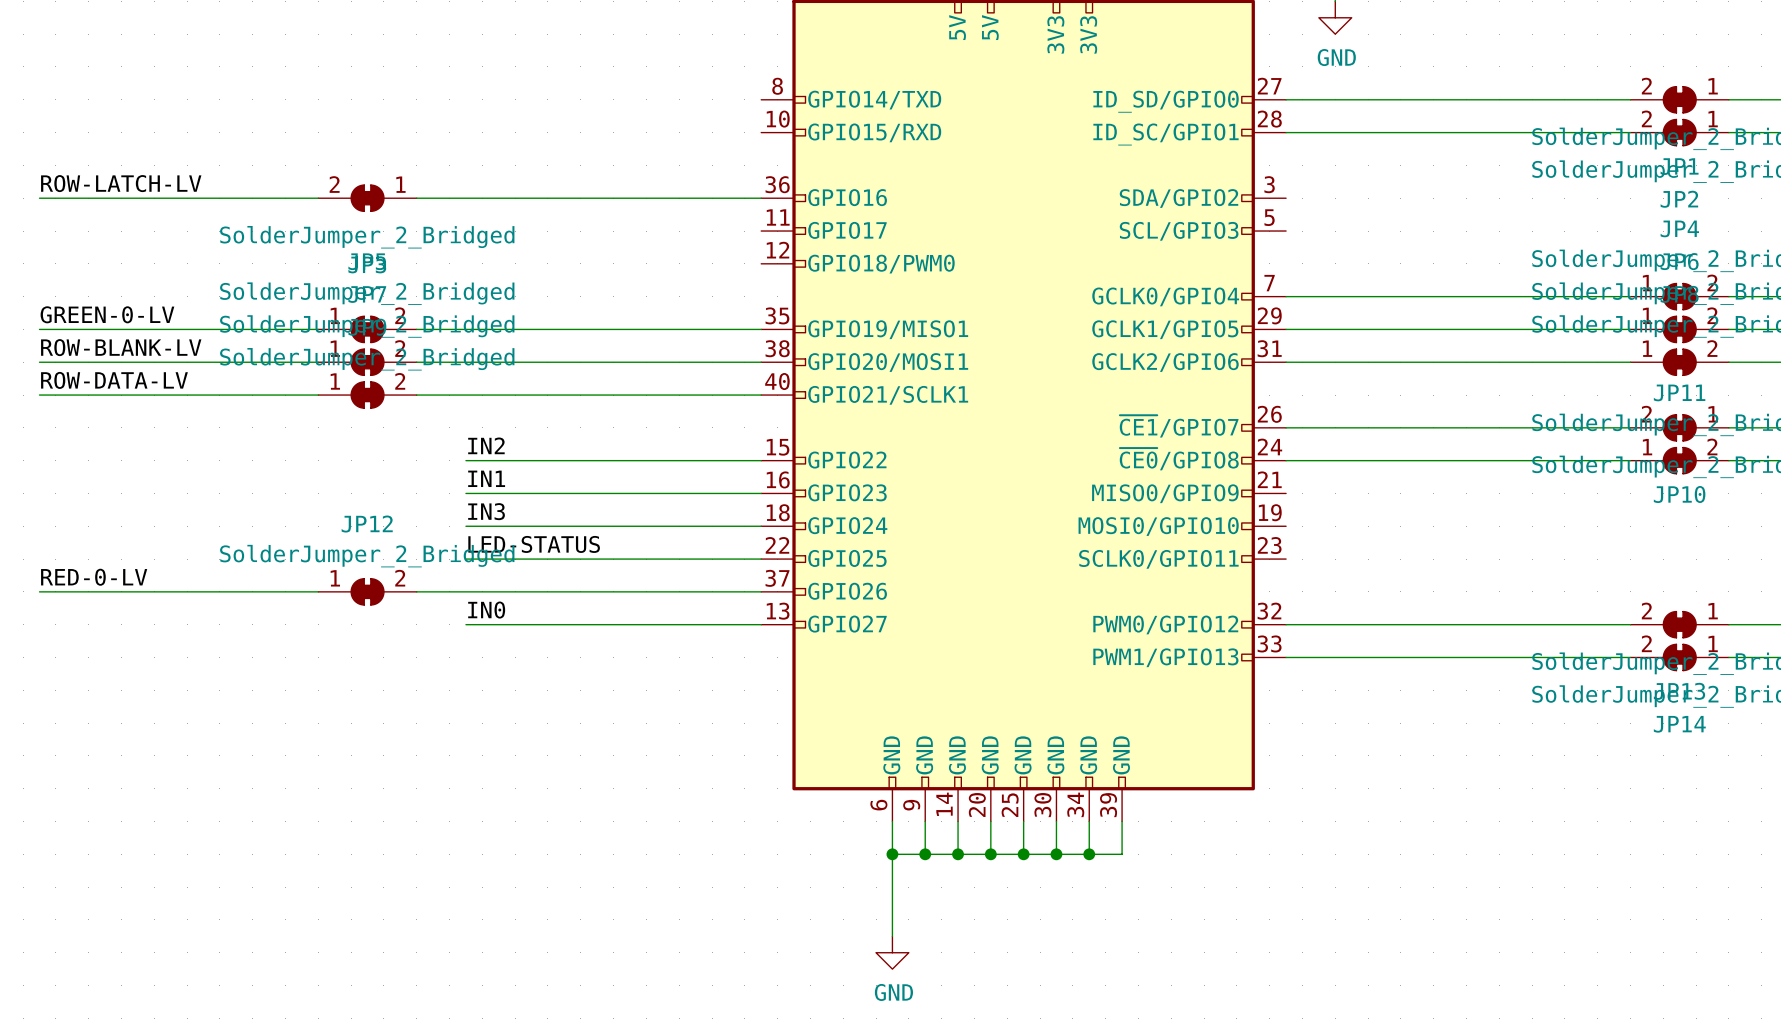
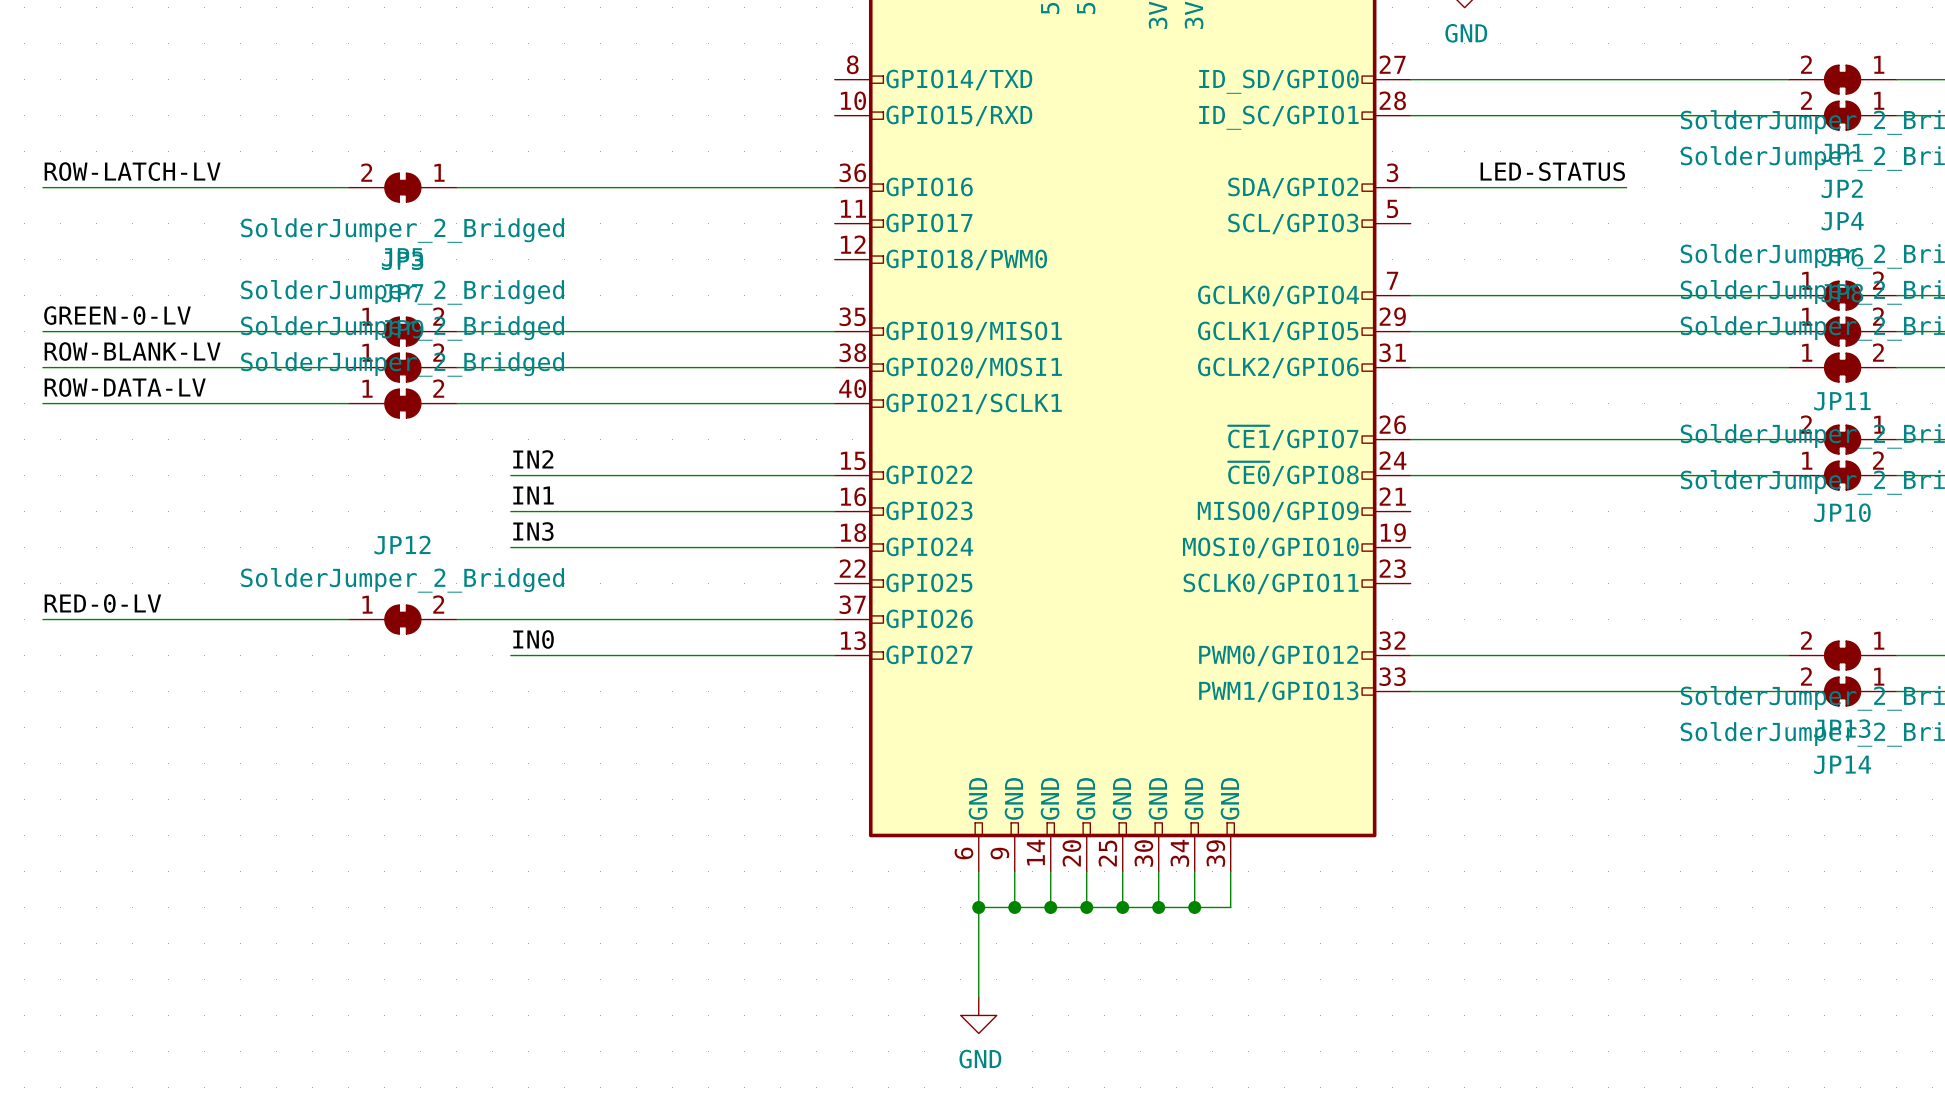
label: none -> LED-STATUS (1552, 171)
wire: none -> (1410, 187) (1626, 187)
label: LED-STATUS (534, 544) -> none
wire: (465, 559) (761, 559) -> none

